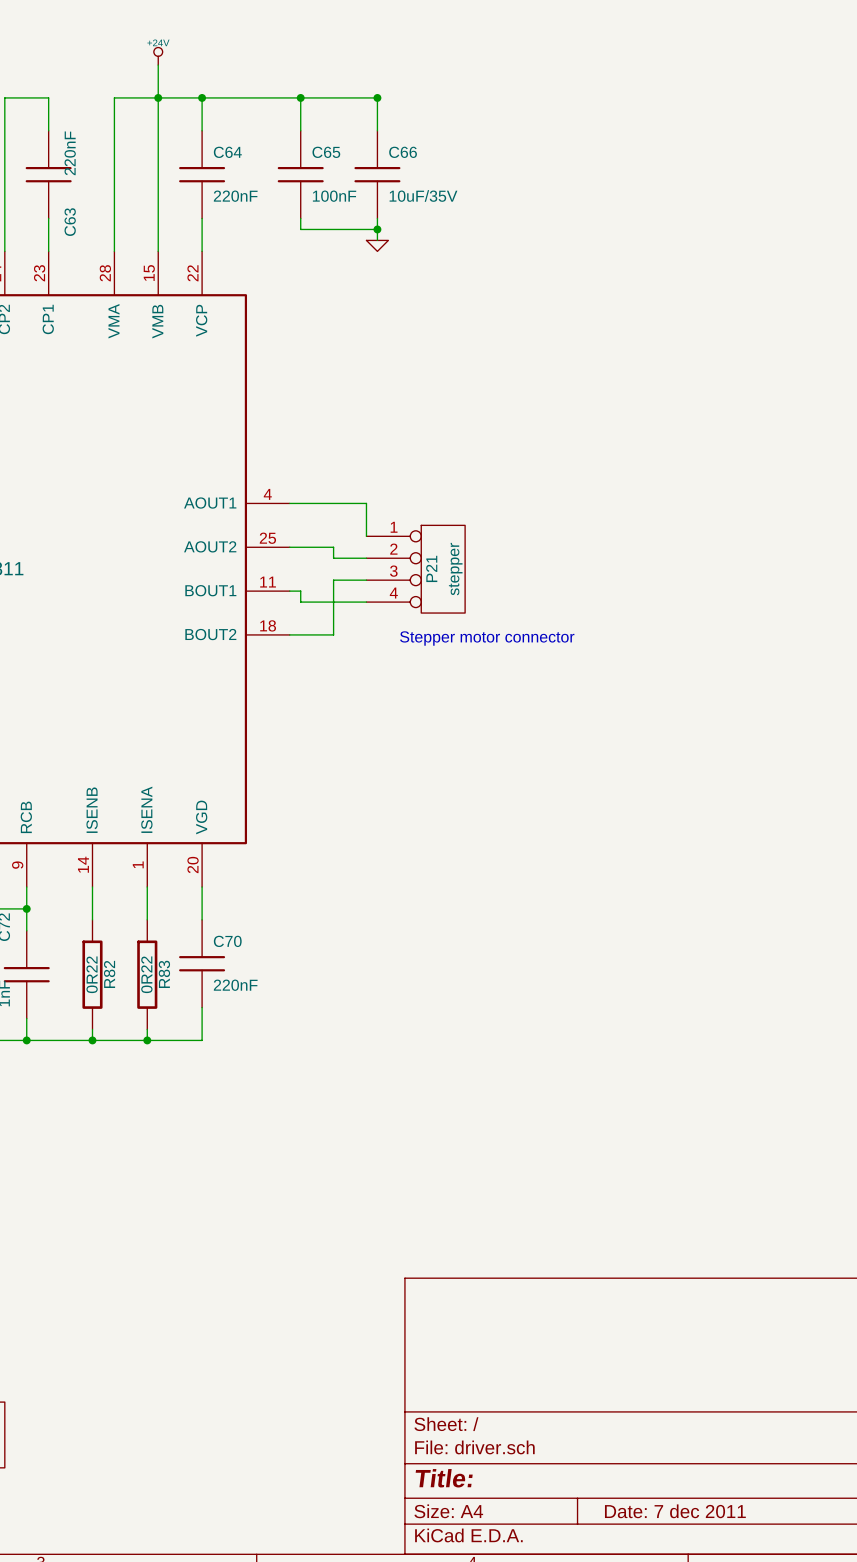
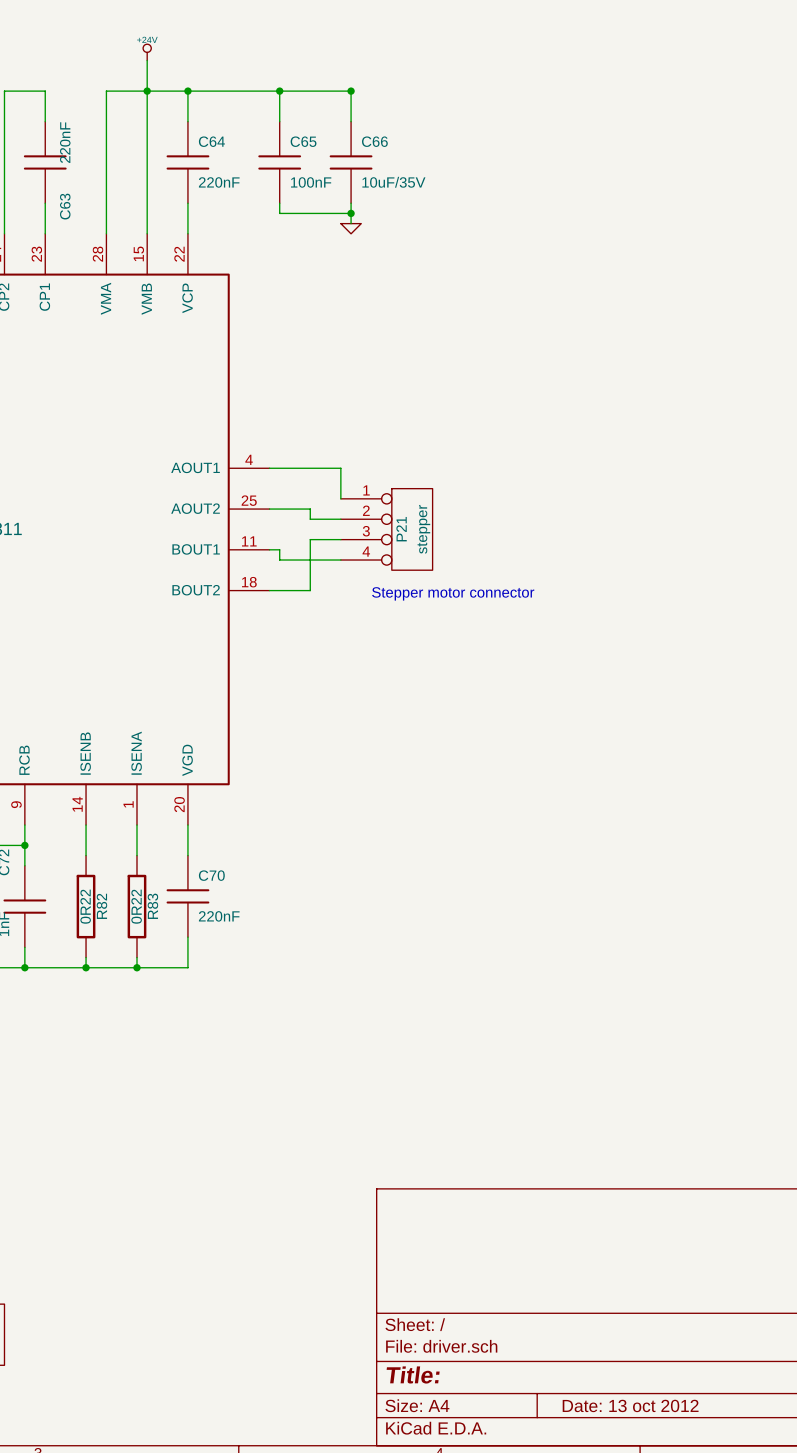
title block: Date: 7 dec 2011 (675, 1511) -> Date: 13 oct 2012 (630, 1405)

